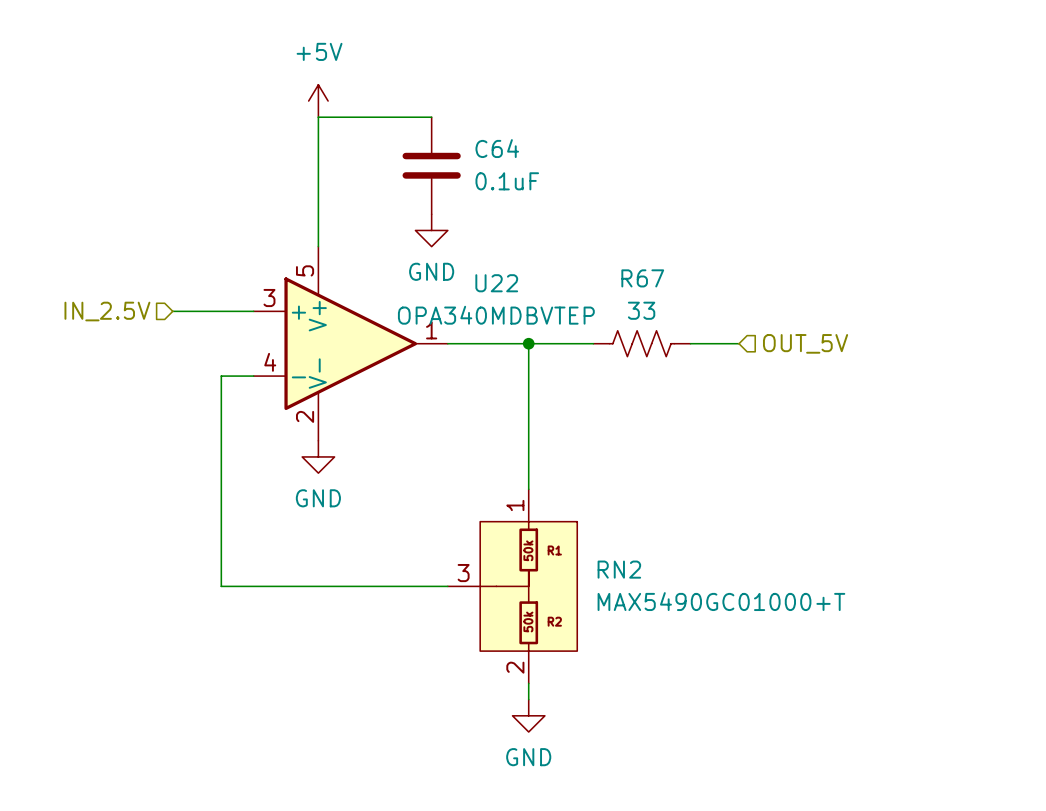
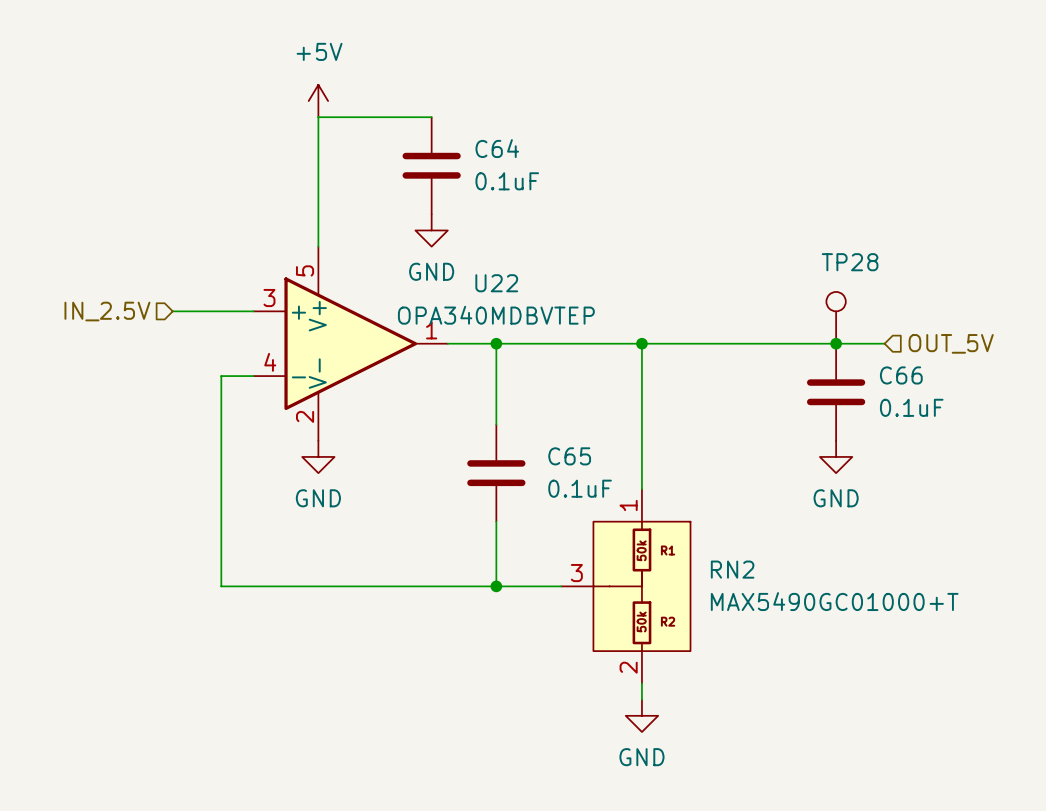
TP28: none -> (836, 317)
wire: none -> (496, 343) (496, 424)
wire: (528, 343) (528, 489) -> (641, 343) (641, 489)
junction position: (528, 343) -> (496, 343)
junction: none -> (641, 343)
R67: 33 (641, 343) -> none
wire: none -> (739, 343) (884, 343)
hierarchical label position: OUT_5V (805, 343) -> OUT_5V (951, 343)
junction: none -> (836, 343)
C66: none -> 0.1uF (836, 392)
power symbol: none -> GND (836, 456)
C65: none -> 0.1uF (496, 473)
junction: none -> (496, 586)
RN2 position: (512, 586) -> (625, 586)
wire: (528, 683) (528, 699) -> (641, 683) (641, 699)
power symbol position: GND (528, 715) -> GND (641, 715)

